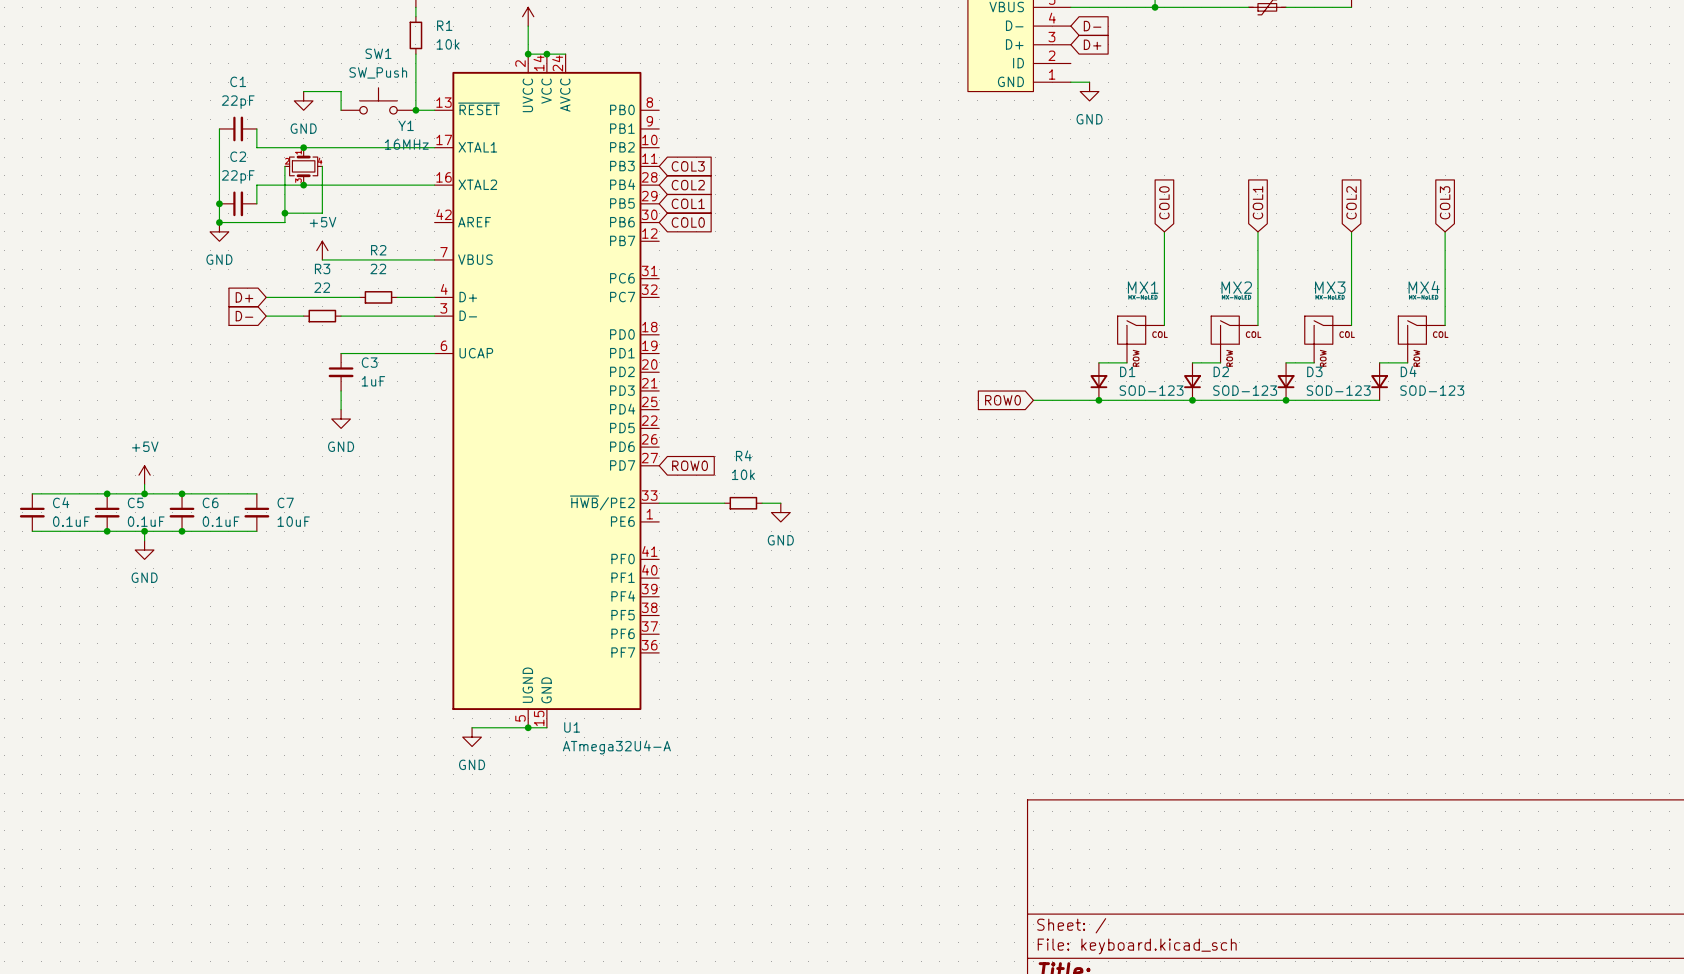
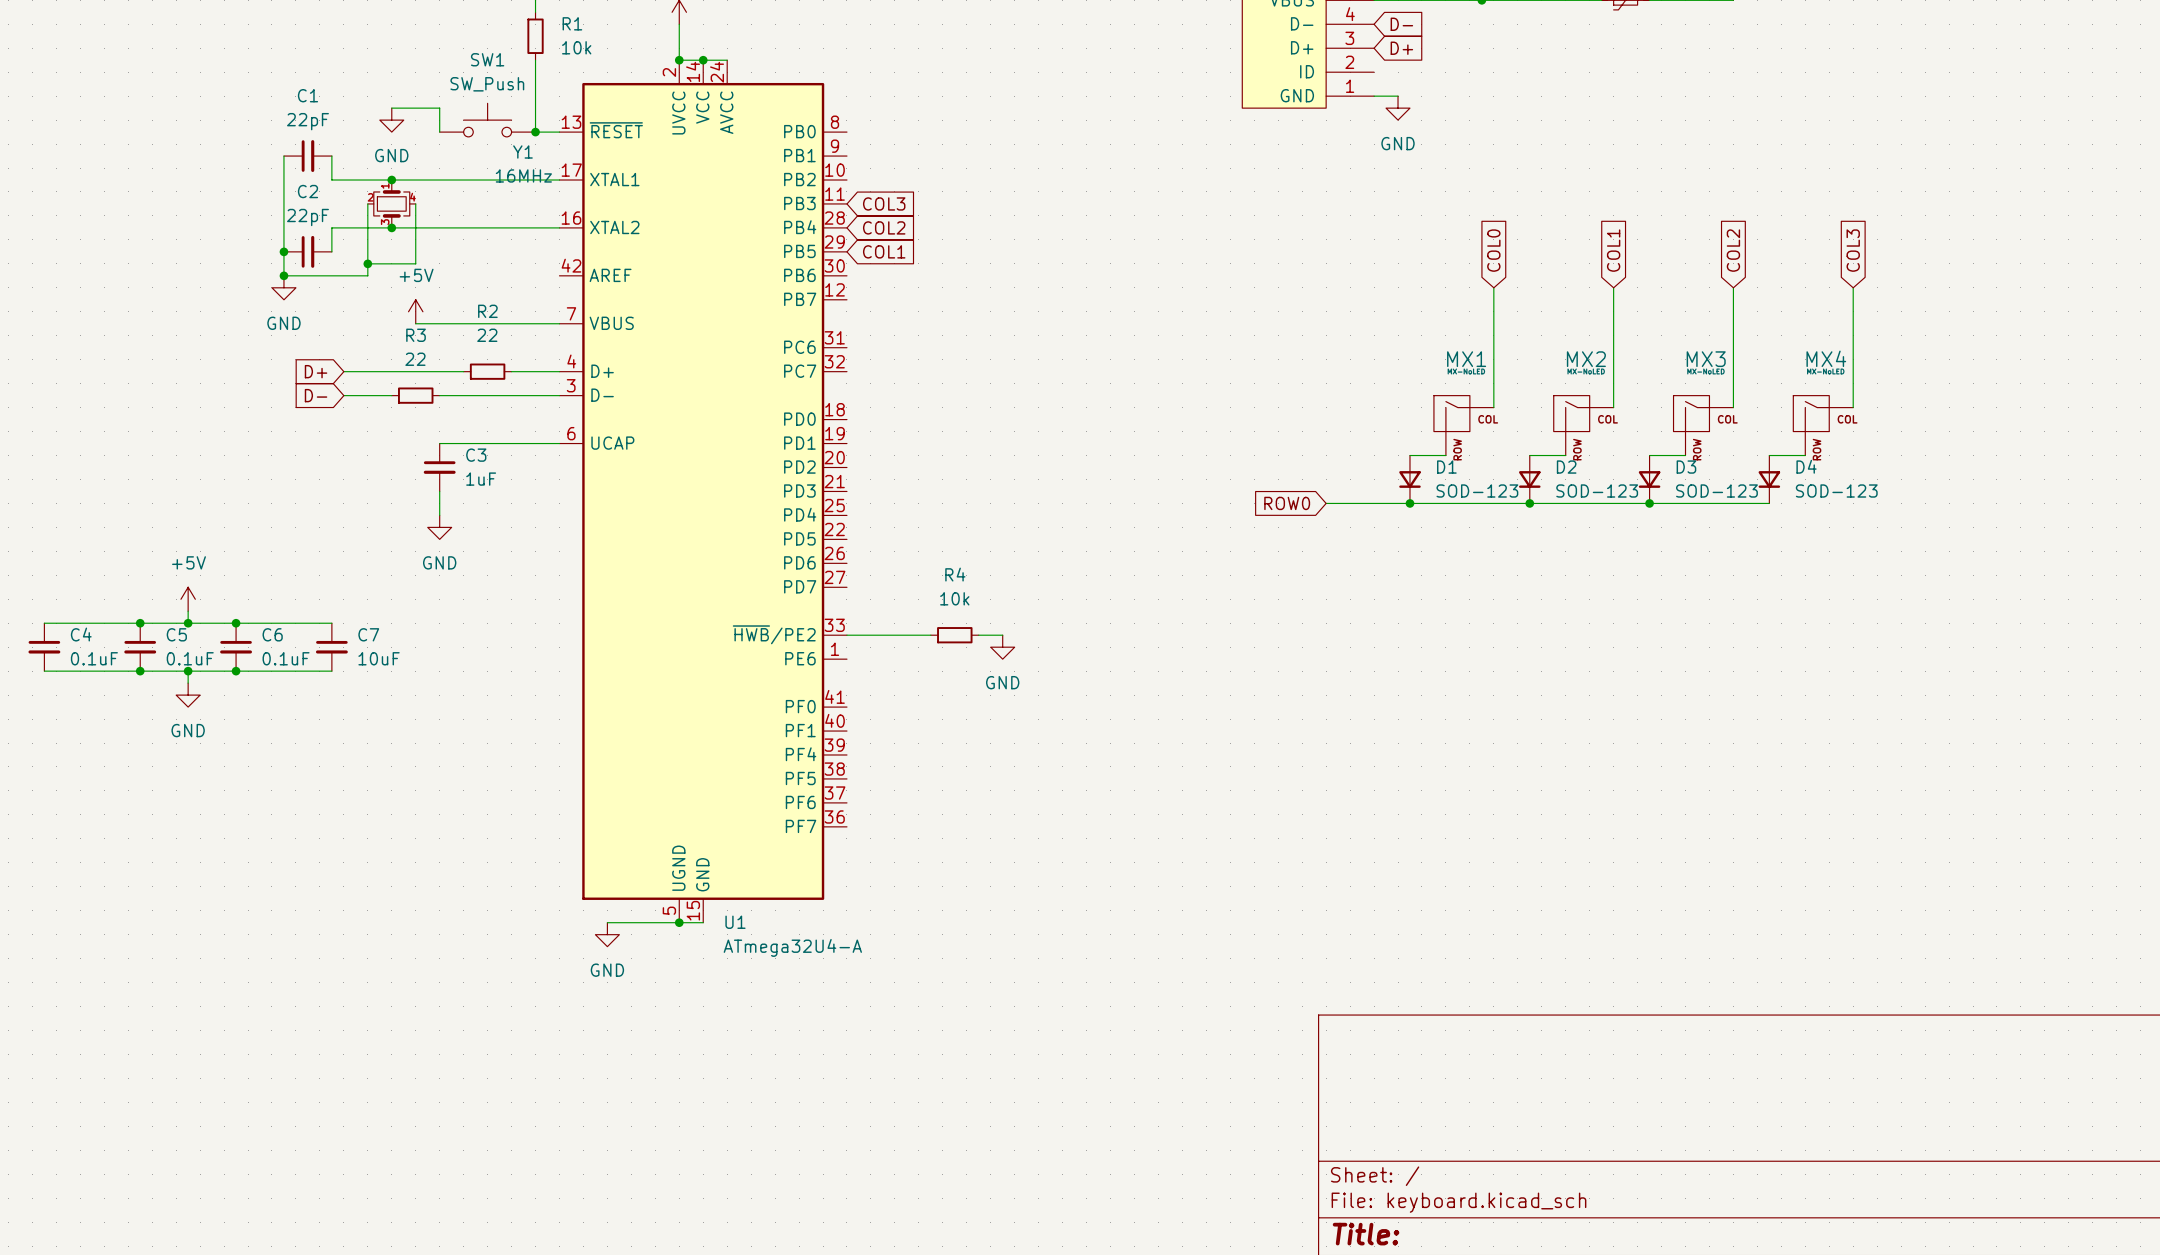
global label: COL0 (688, 222) -> none
global label: ROW0 (690, 465) -> none

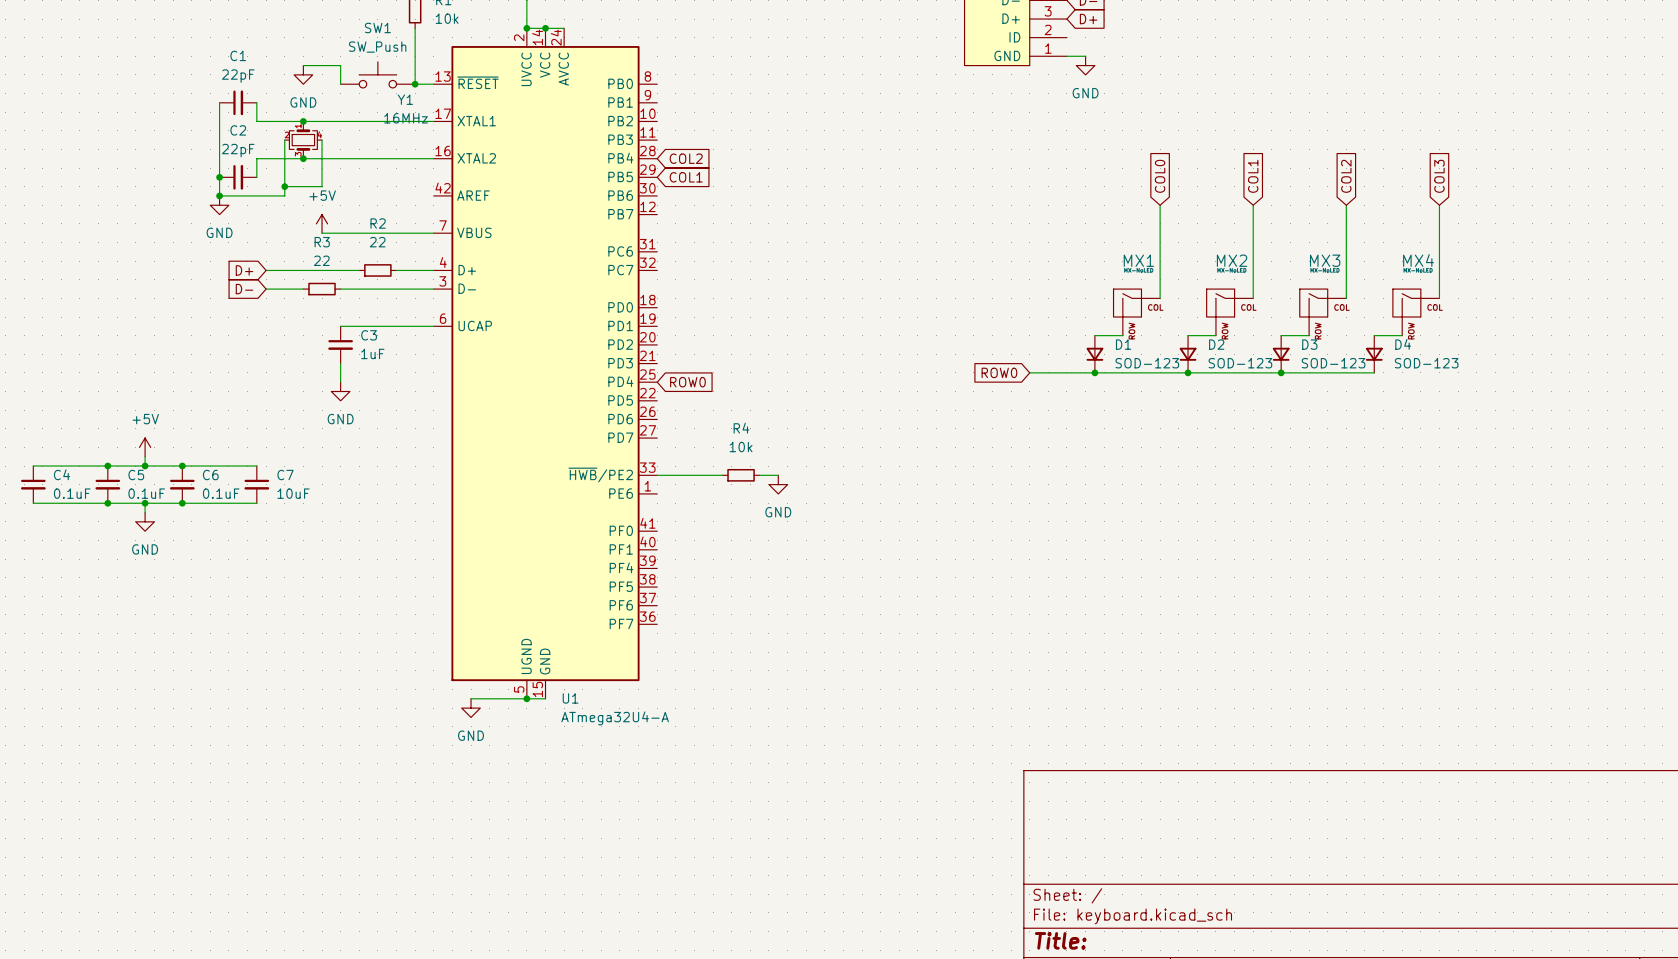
global label: COL3 (884, 203) -> none
global label: none -> ROW0 (687, 382)

